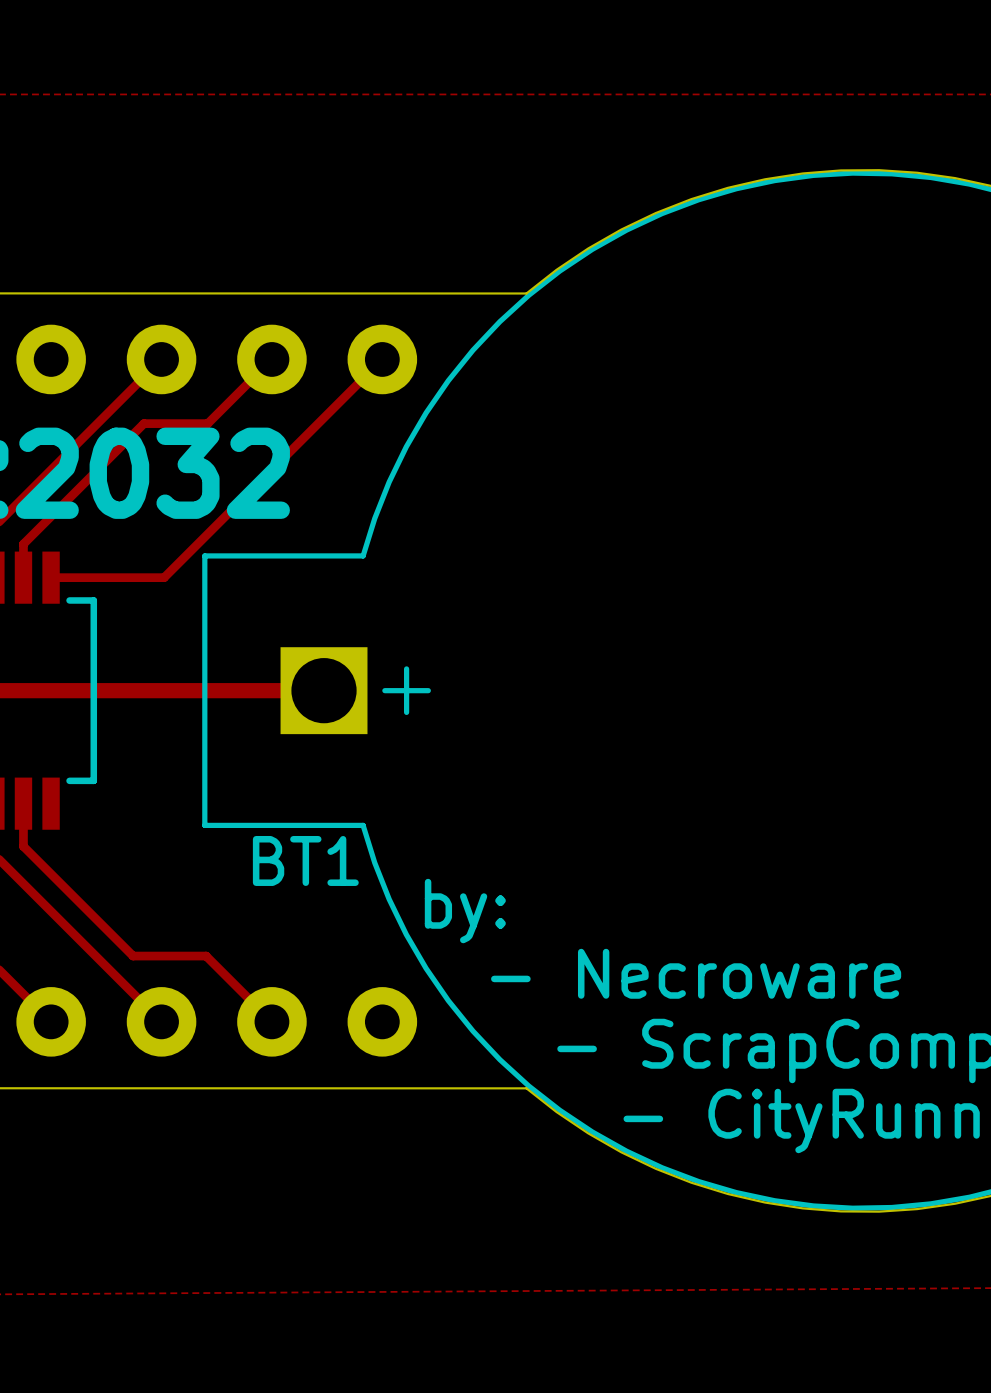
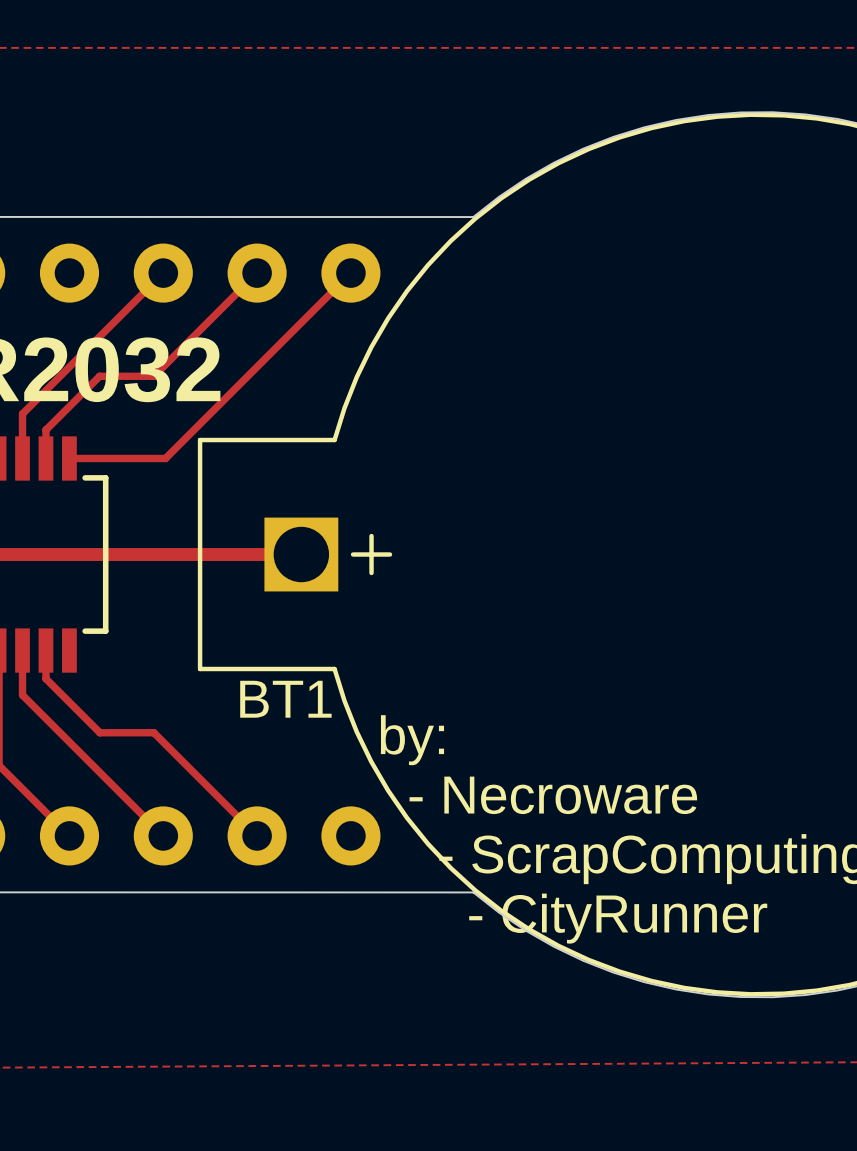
track: (207, 423) (143, 423) (86, 480) -> (202, 327) (153, 376) (99, 376)
track: (23, 836) (23, 846) (133, 956) (206, 956) -> (45, 678) (99, 732) (153, 732) (201, 780)

